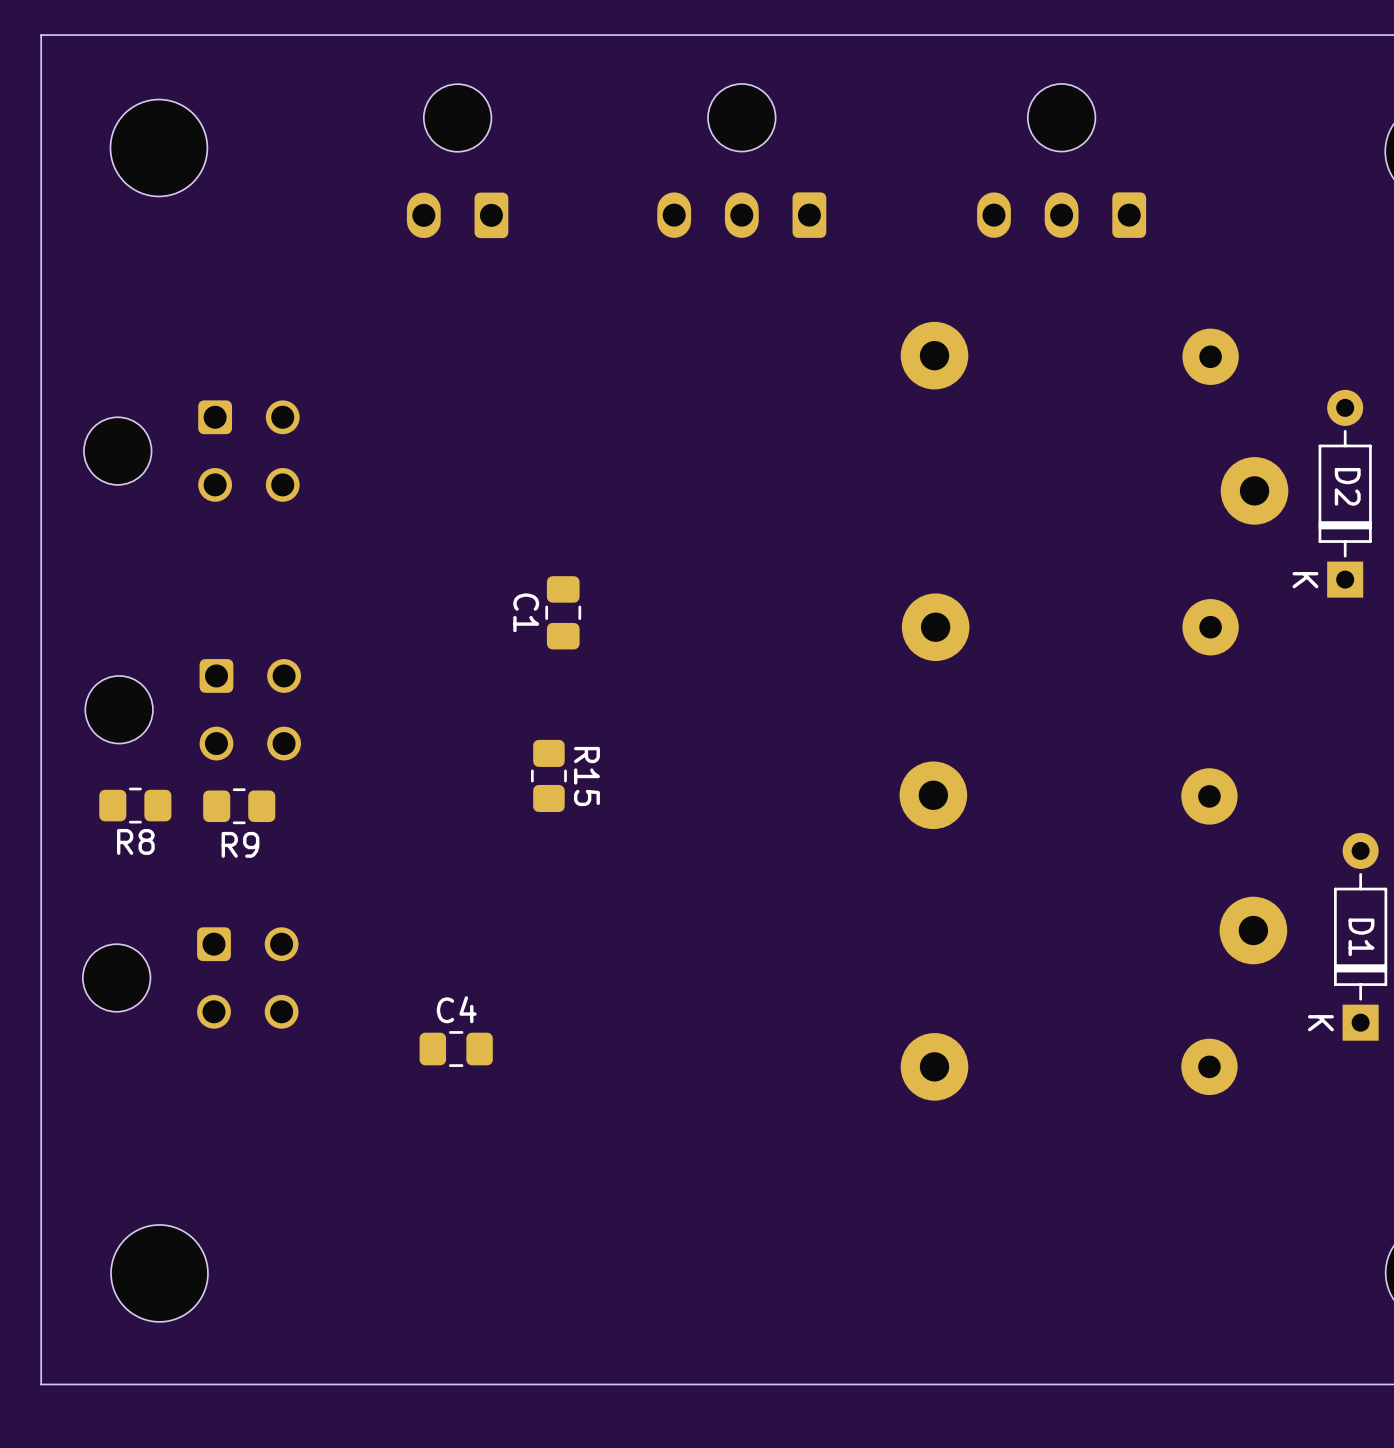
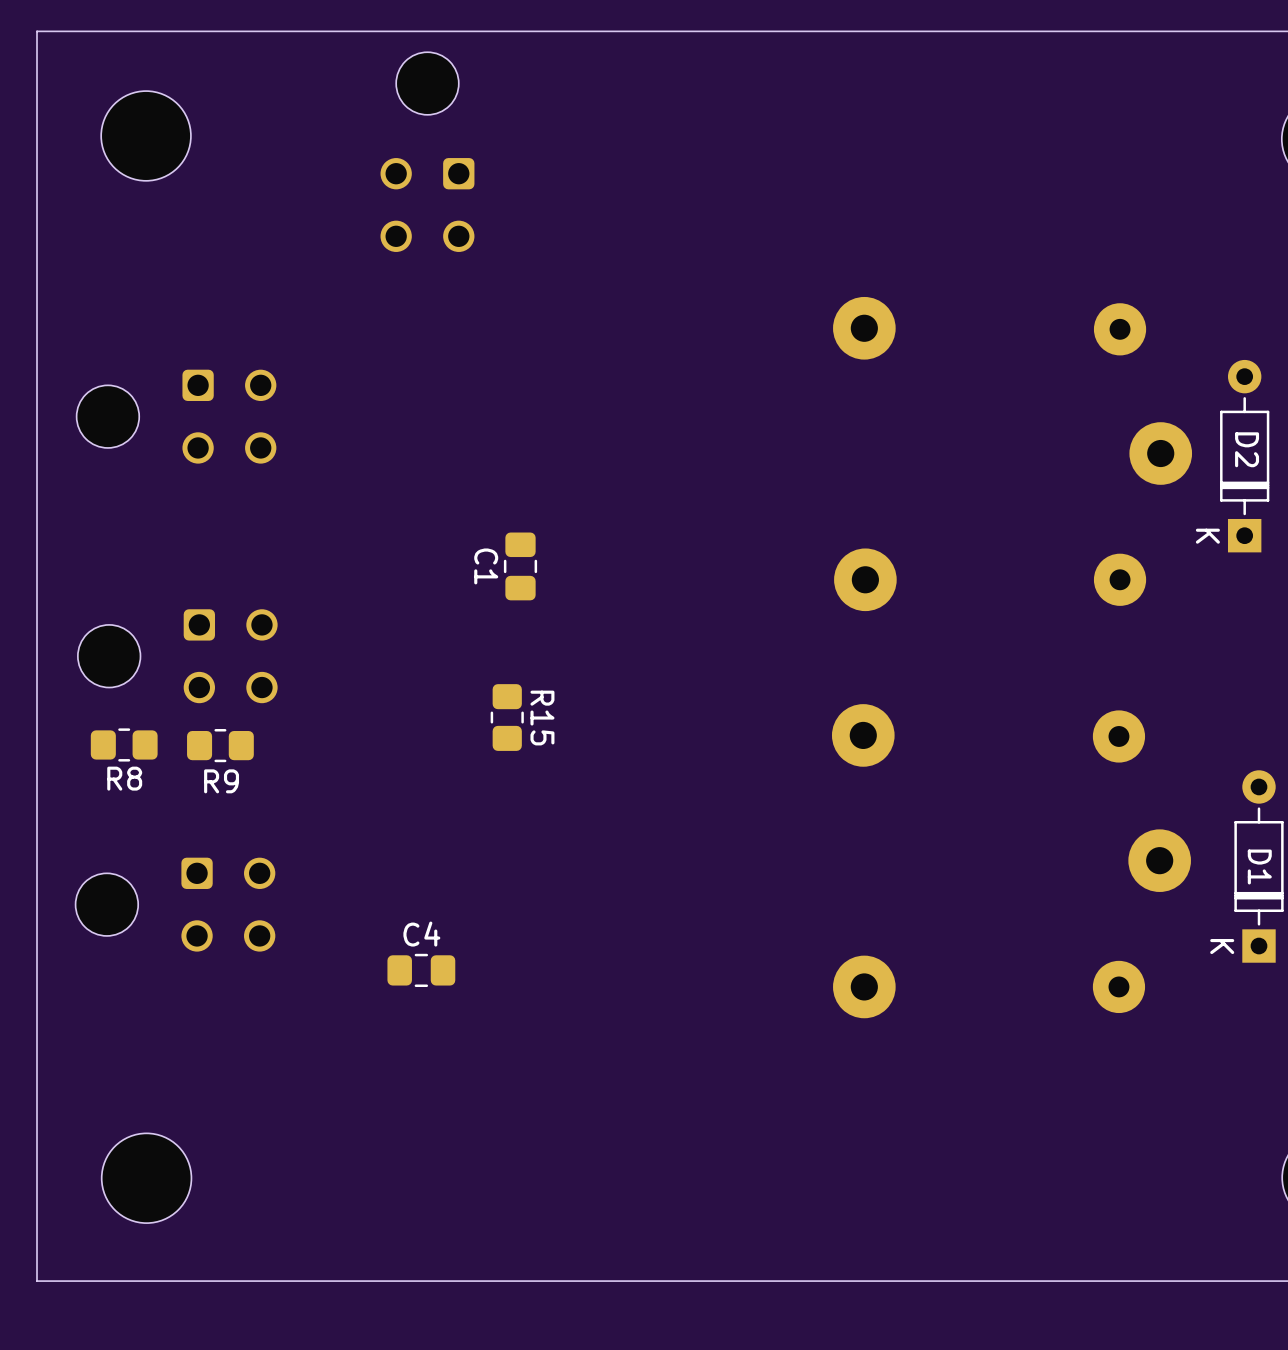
part footprint: [406, 84, 509, 239] -> [380, 52, 475, 252]
part: (741, 160) -> none
part: (1061, 160) -> none

